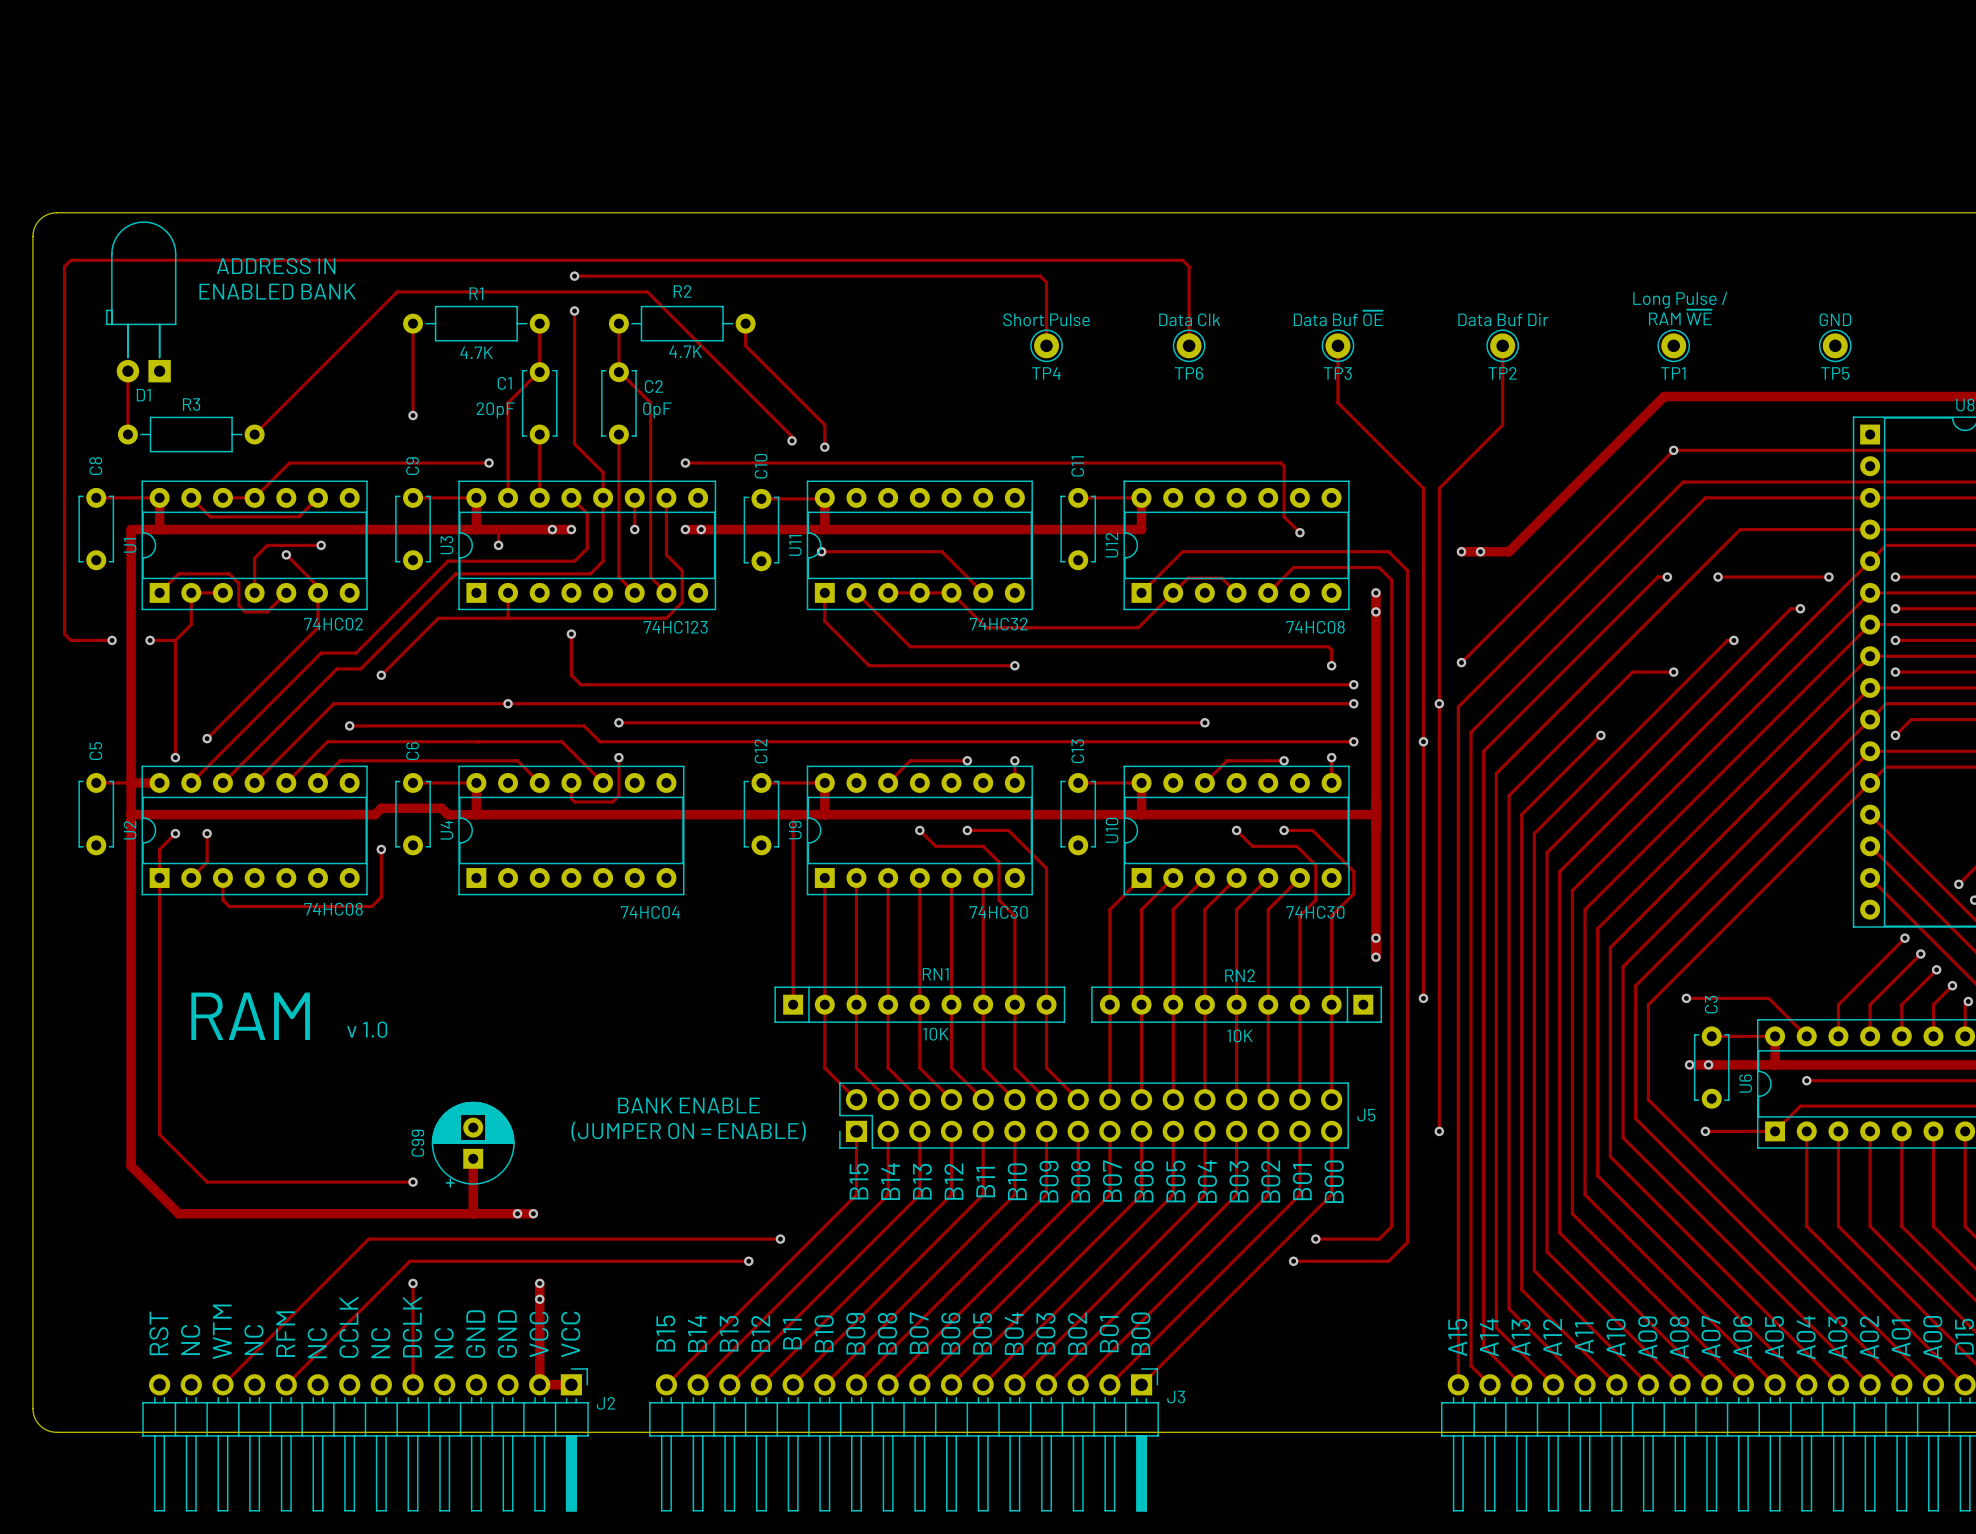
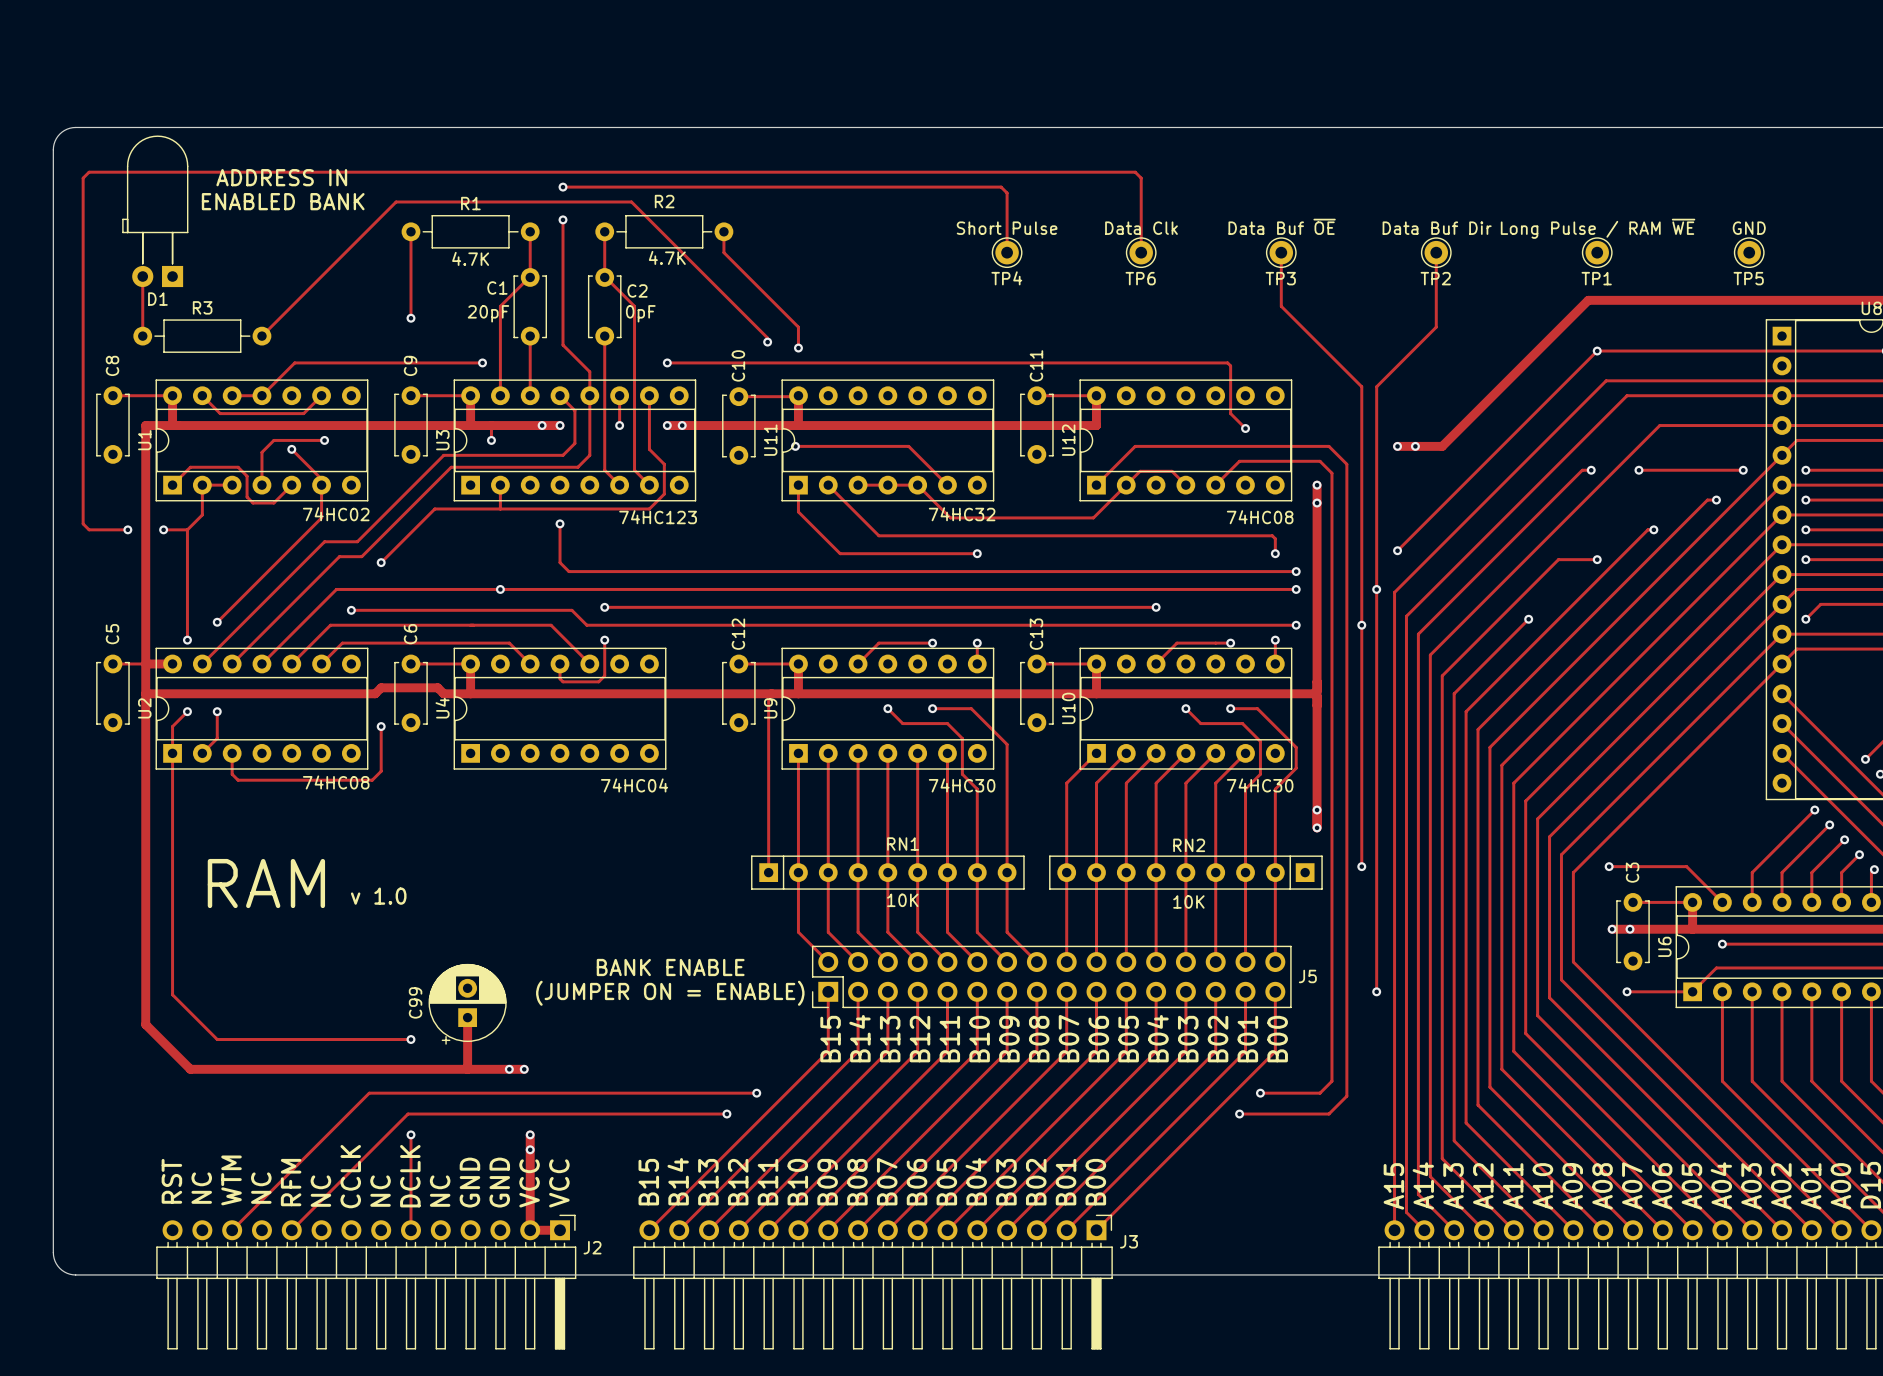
text: Long Pulse / (1680, 300) -> none
text: RAM ~{WE} (1680, 317) -> none
TP1 value: none -> Long Pulse / RAM ~{WE} (1598, 228)

